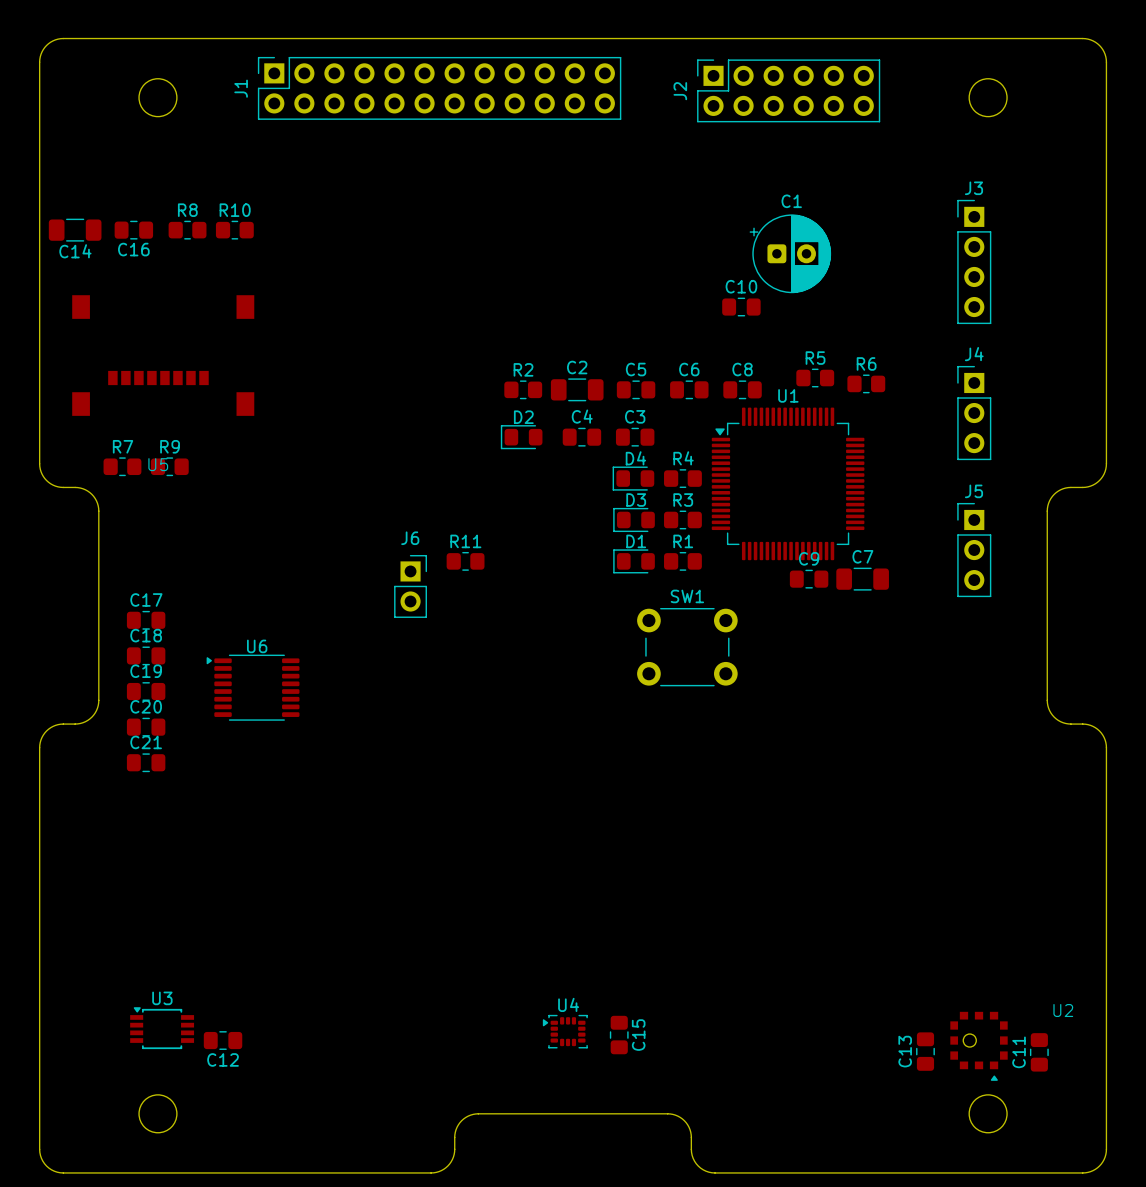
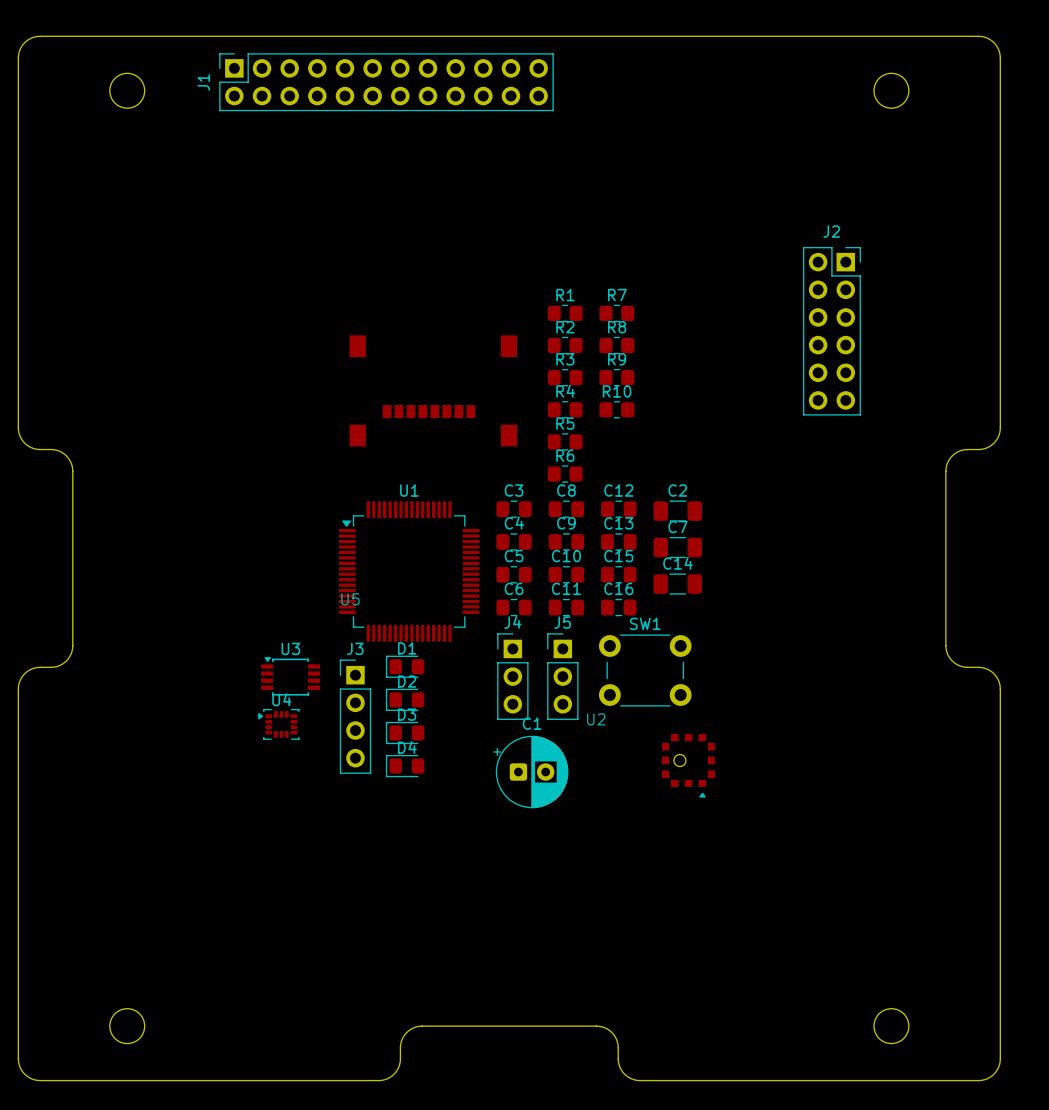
J2 rotation: 0° (788, 90) -> 90° clockwise (831, 331)
J2 position: (788, 90) -> (831, 331)
C14 position: (75, 230) -> (677, 584)
C16 position: (133, 230) -> (618, 607)
R8 position: (187, 230) -> (616, 345)
R10 position: (234, 230) -> (616, 409)
C16 name position: C16 (133, 249) -> C16 (618, 588)
C14 name position: C14 (75, 251) -> C14 (677, 563)
C1 position: (790, 253) -> (530, 772)
J3 position: (974, 261) -> (355, 716)
C10 position: (741, 307) -> (566, 574)
U5 position: (163, 355) -> (433, 390)
R5 position: (815, 378) -> (565, 441)
R6 position: (866, 383) -> (565, 474)
R2 position: (523, 389) -> (565, 345)
C2 position: (577, 389) -> (677, 511)
C5 position: (636, 389) -> (514, 574)
C6 position: (689, 389) -> (514, 607)
C8 position: (742, 389) -> (566, 509)
J4 position: (974, 413) -> (512, 676)
D2 position: (521, 437) -> (405, 699)
C4 position: (581, 437) -> (514, 542)
C3 position: (635, 437) -> (514, 509)
U5 name position: U5 (158, 464) -> U5 (350, 599)
R7 position: (122, 466) -> (616, 313)
R9 position: (169, 466) -> (616, 377)
D4 position: (633, 478) -> (405, 766)
R4 position: (682, 478) -> (565, 409)
U1 position: (788, 483) -> (409, 571)
D3 position: (634, 519) -> (405, 732)
R3 position: (682, 519) -> (565, 377)
J5 position: (974, 550) -> (562, 676)
R11: (465, 561) -> none
D1 position: (634, 561) -> (405, 666)
R1 position: (682, 561) -> (565, 313)
C9 position: (809, 579) -> (566, 542)
C7 position: (862, 579) -> (677, 547)
J6: (410, 586) -> none
C17: (146, 620) -> none
SW1 position: (687, 647) -> (645, 670)
C18: (146, 655) -> none
U6: (253, 687) -> none
C19: (146, 691) -> none
C20: (146, 727) -> none
C21: (146, 762) -> none
U2 name position: U2 (1063, 1010) -> U2 (596, 719)
U3 position: (162, 1028) -> (290, 676)
U4 position: (565, 1031) -> (278, 724)
C15 rotation: 0° (619, 1035) -> 90° clockwise (618, 574)
C15 position: (619, 1035) -> (618, 574)
C15 name position: C15 (638, 1035) -> C15 (618, 556)
C12 position: (223, 1040) -> (618, 509)
U2 position: (979, 1046) -> (688, 765)
C13 rotation: 0° (925, 1051) -> 90° clockwise (618, 542)
C13 position: (925, 1051) -> (618, 542)
C11 rotation: 0° (1039, 1052) -> 90° clockwise (566, 607)
C11 position: (1039, 1052) -> (566, 607)
C12 name position: C12 (223, 1059) -> C12 (618, 490)

